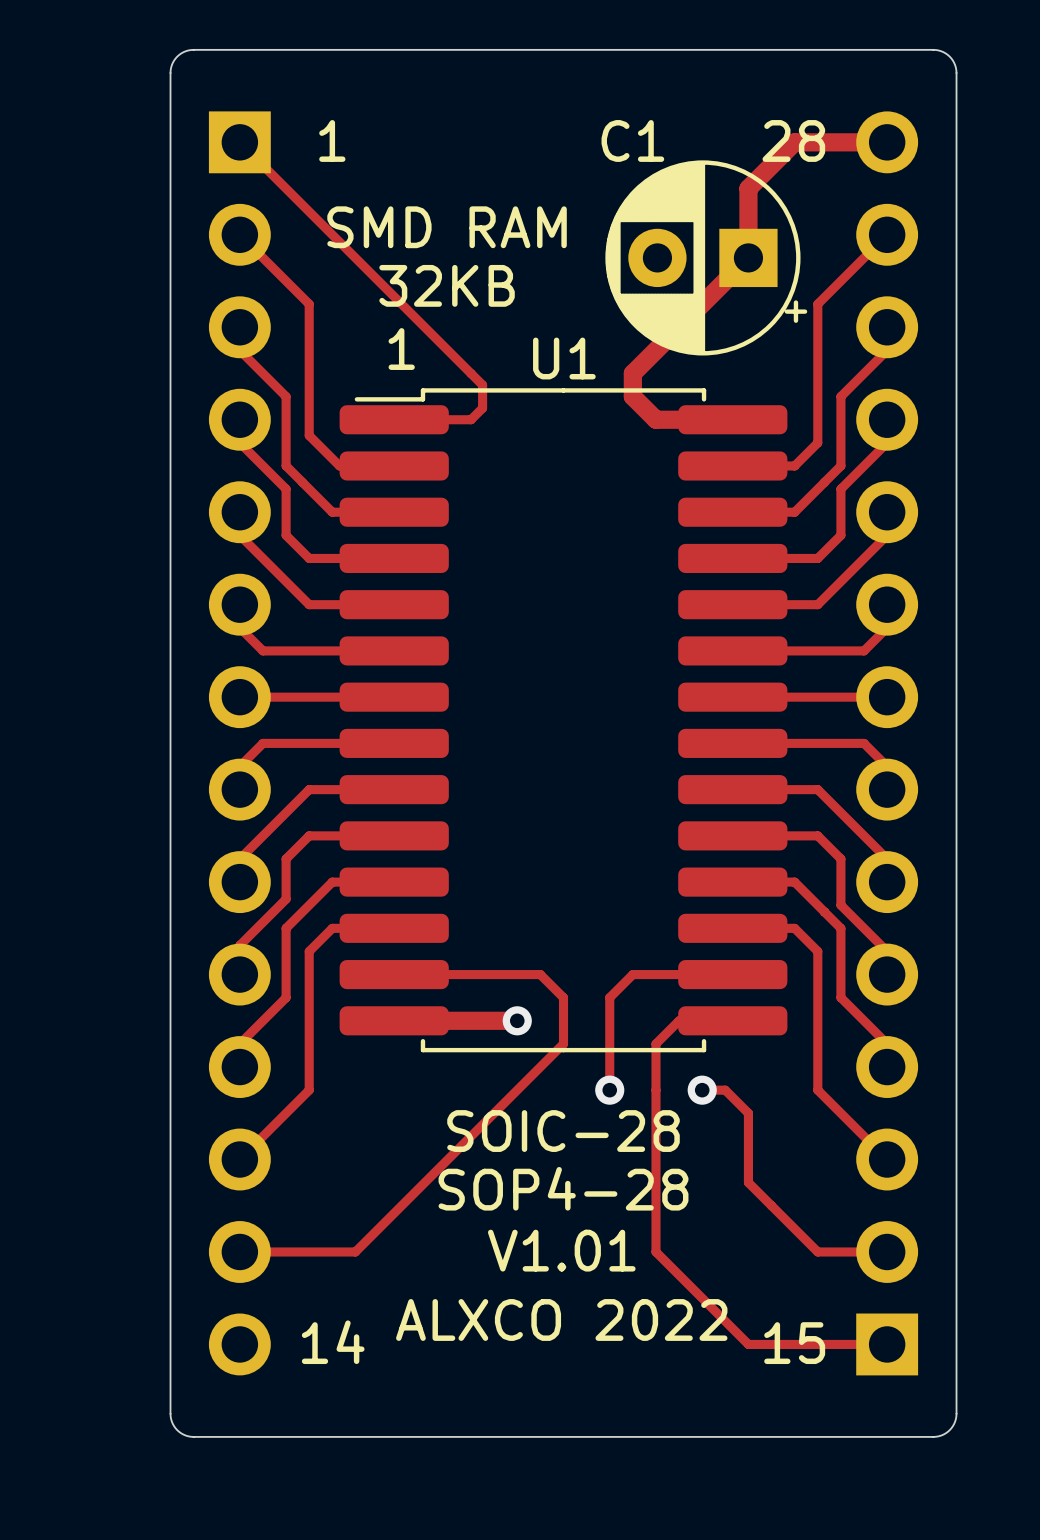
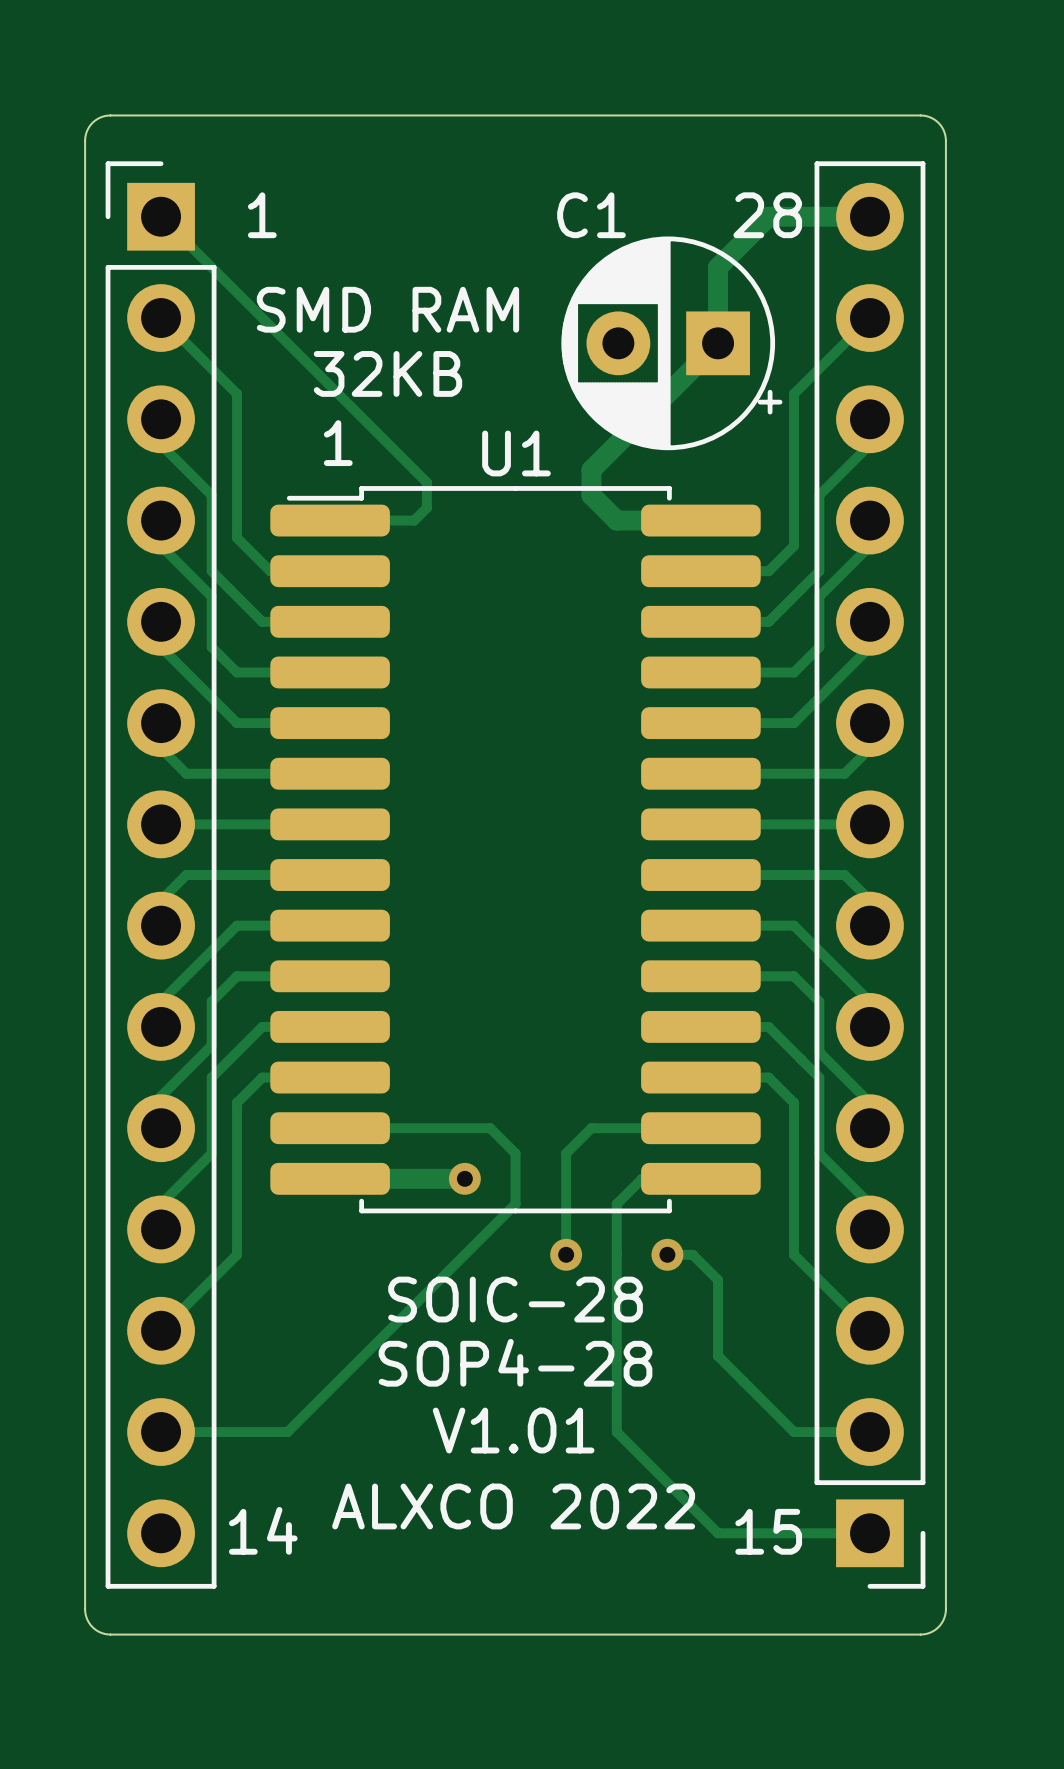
part side: bottom (239, 743) -> top (161, 875)
part side: bottom (887, 743) -> top (869, 875)

